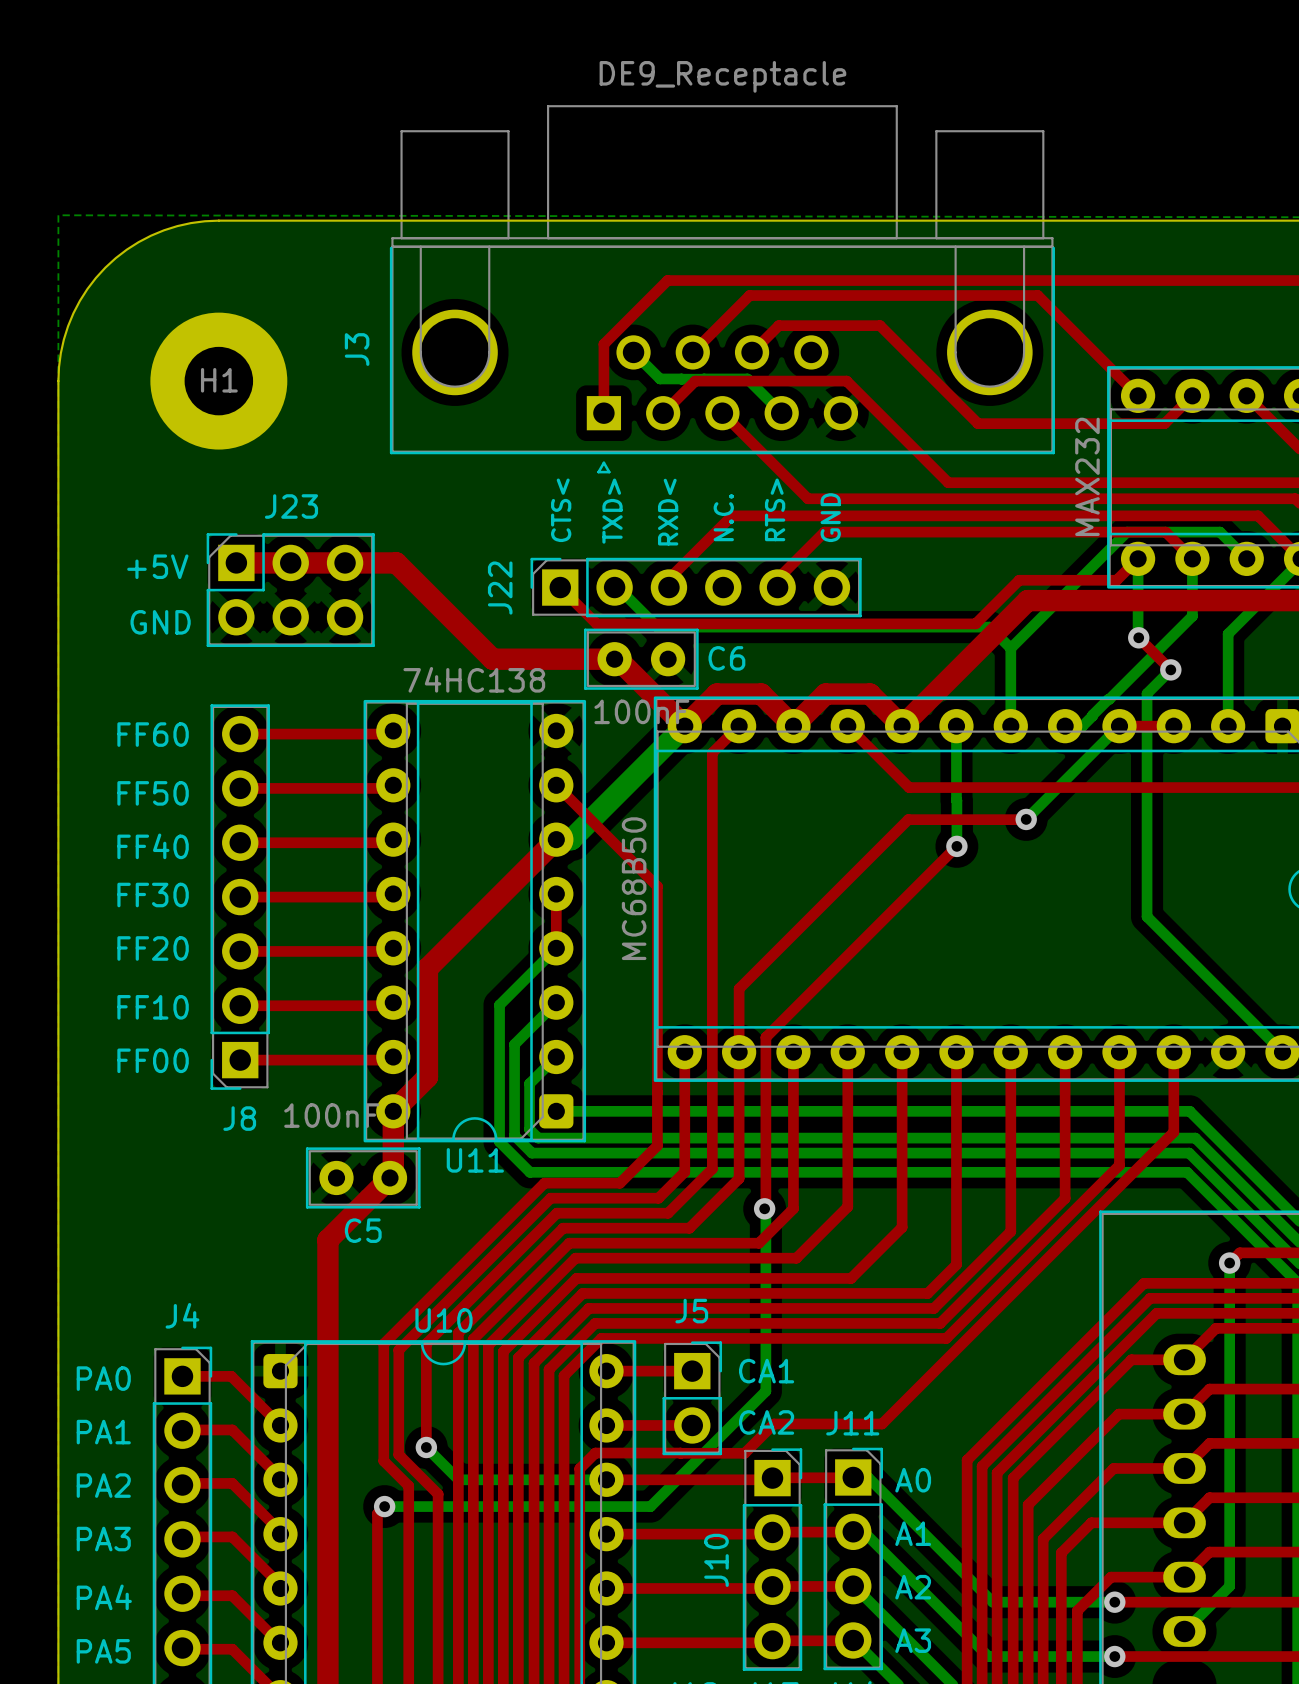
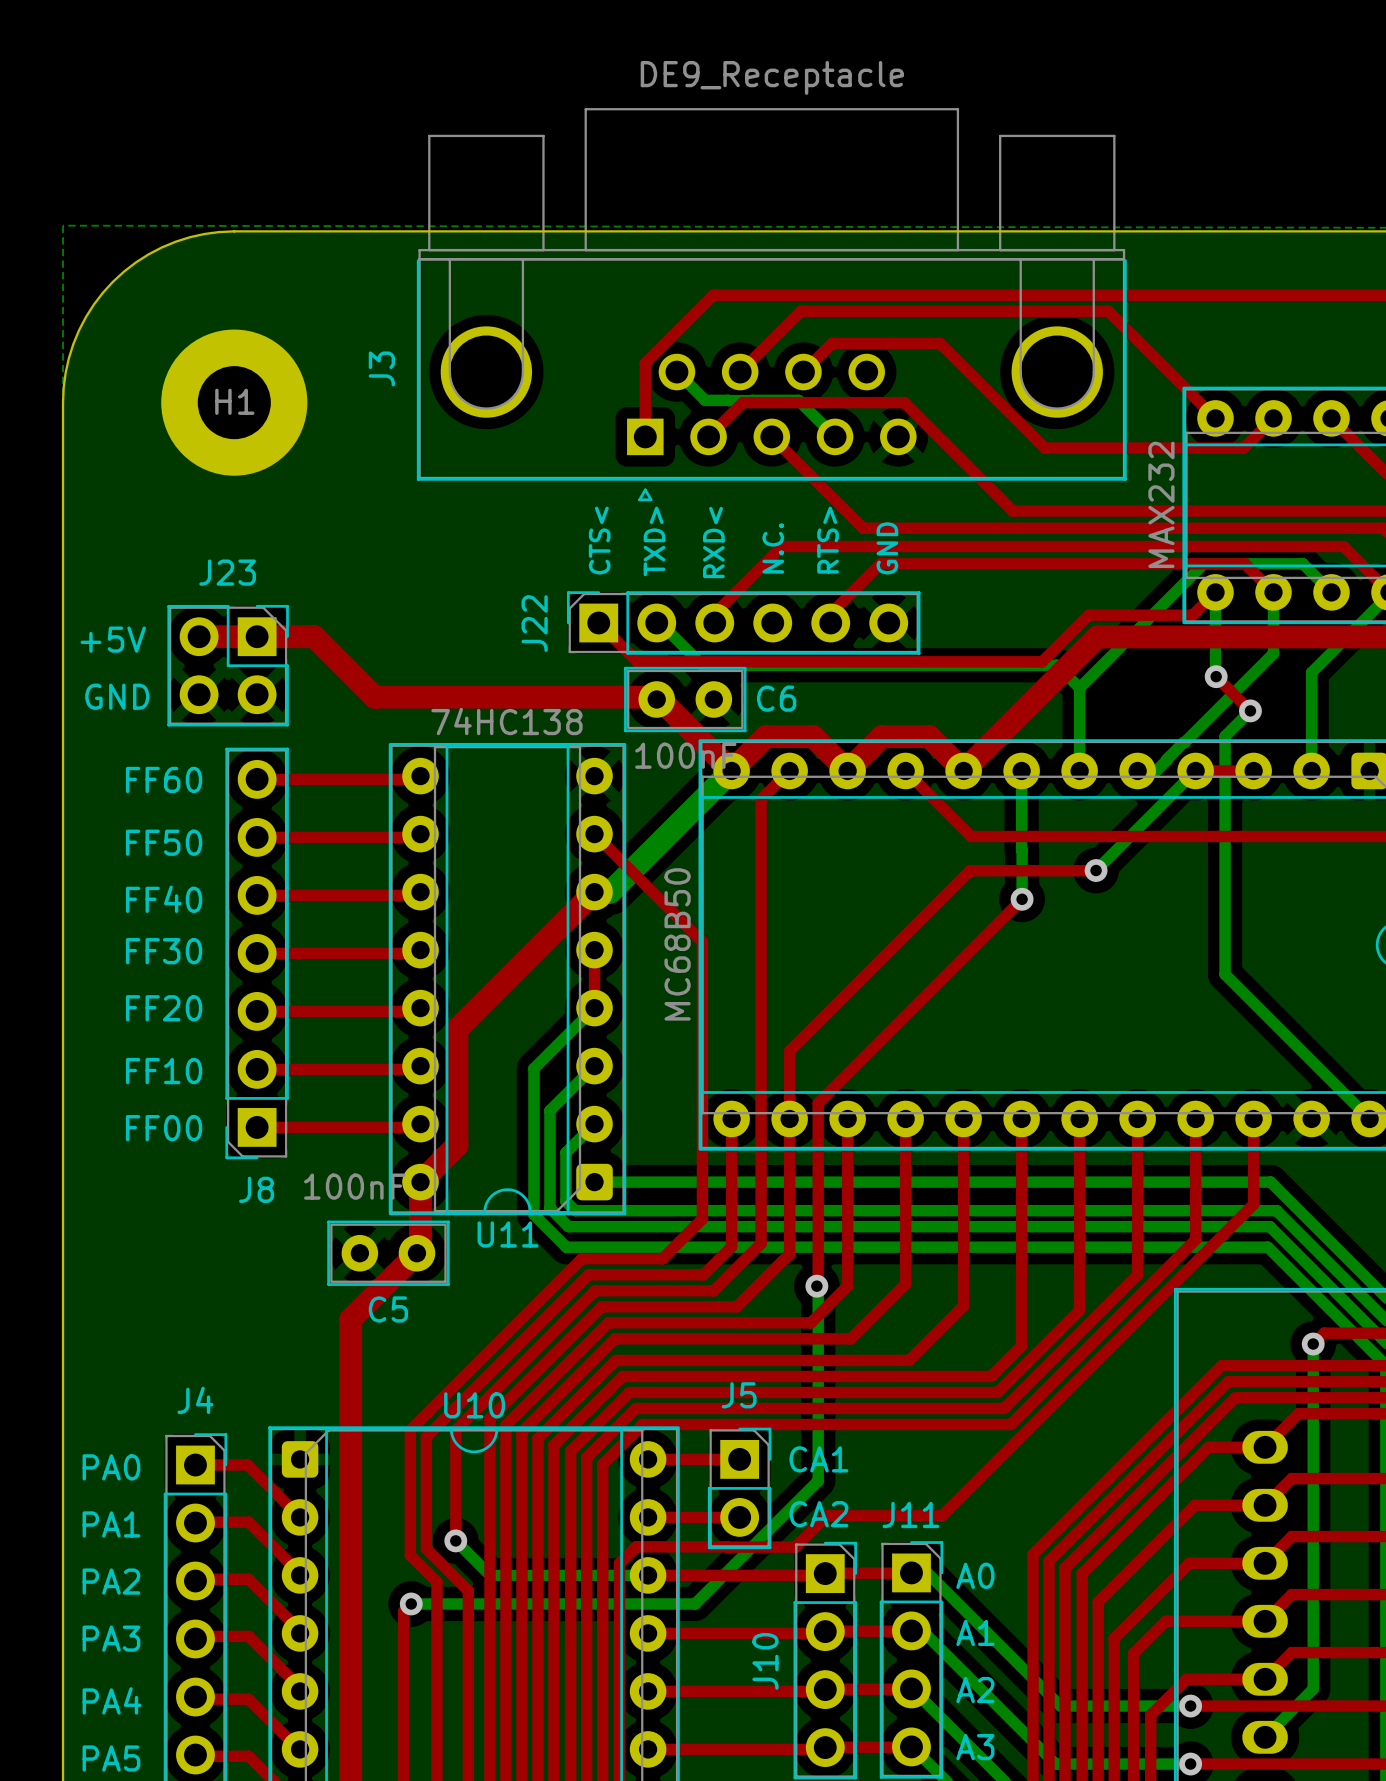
J23 footprint: [206, 533, 375, 648] -> [167, 604, 289, 727]
top track: (236, 562) (396, 562) (492, 659) (614, 659) -> none
text position: +5V (157, 566) -> +5V (113, 639)
top track: none -> (199, 636) (314, 636) (374, 697) (657, 697)
text position: GND (160, 622) -> GND (117, 696)

